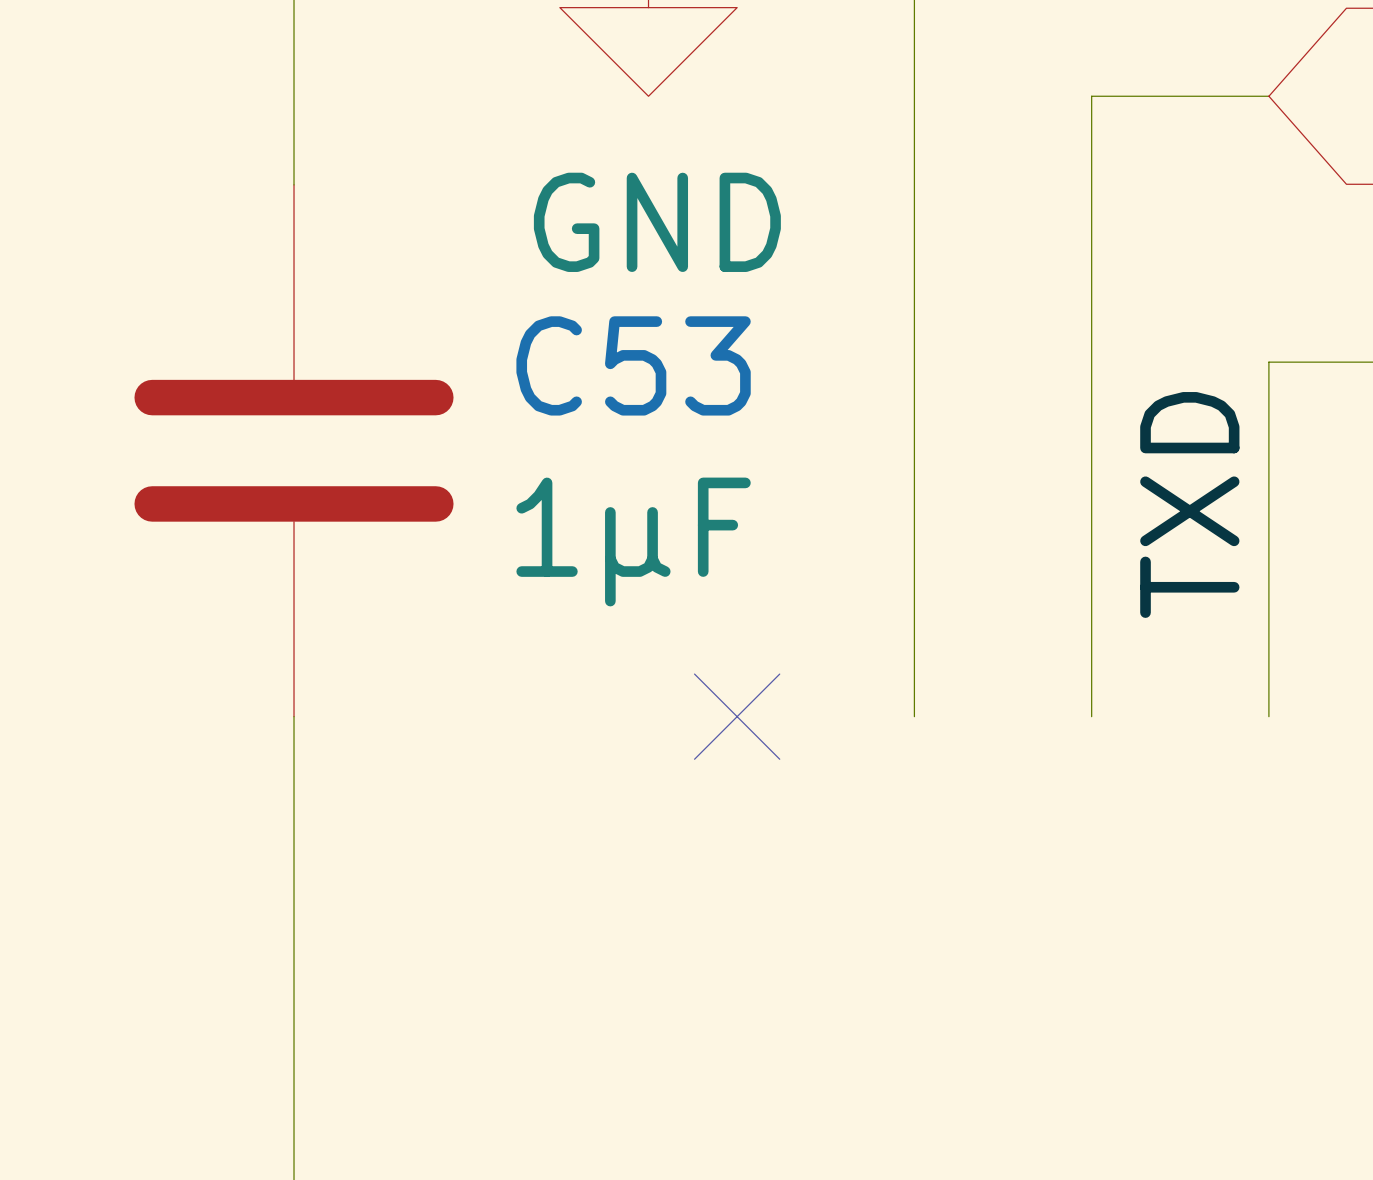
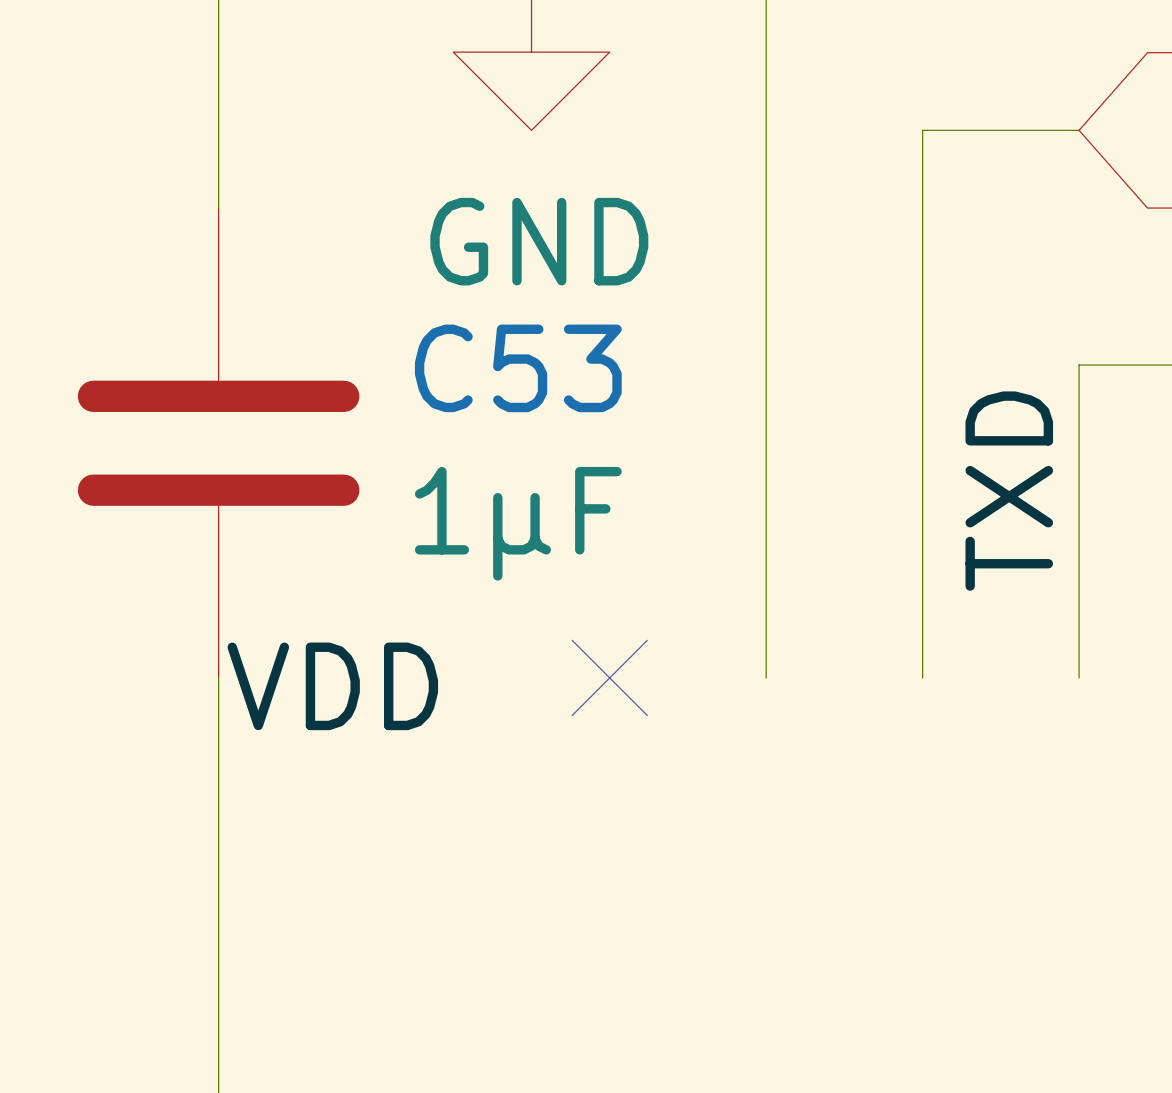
label: none -> VDD (332, 686)

